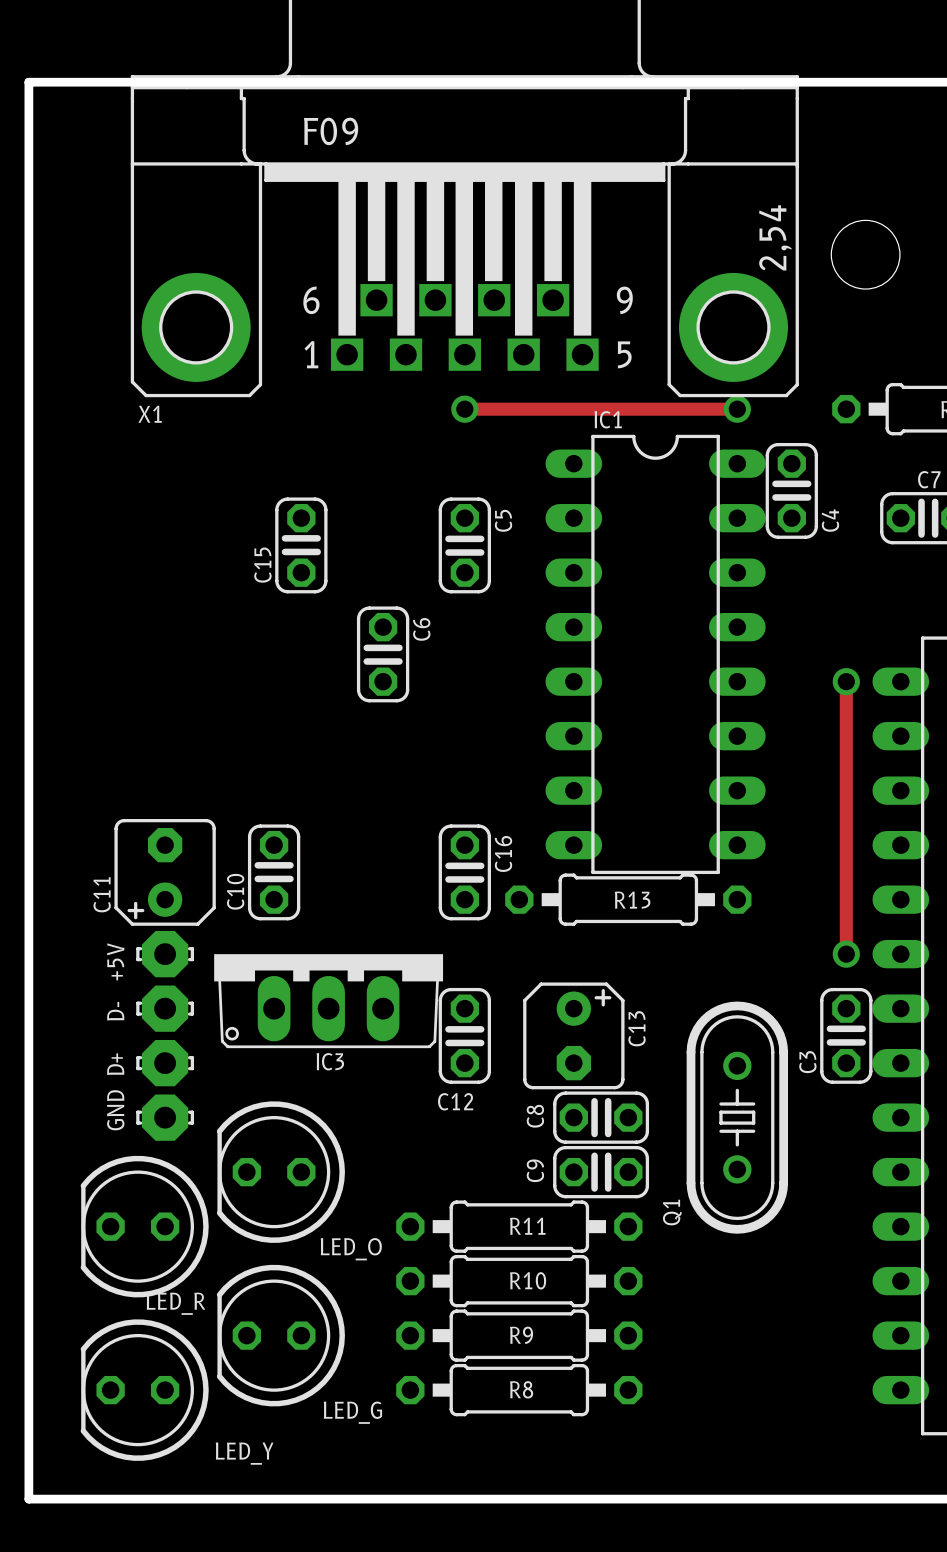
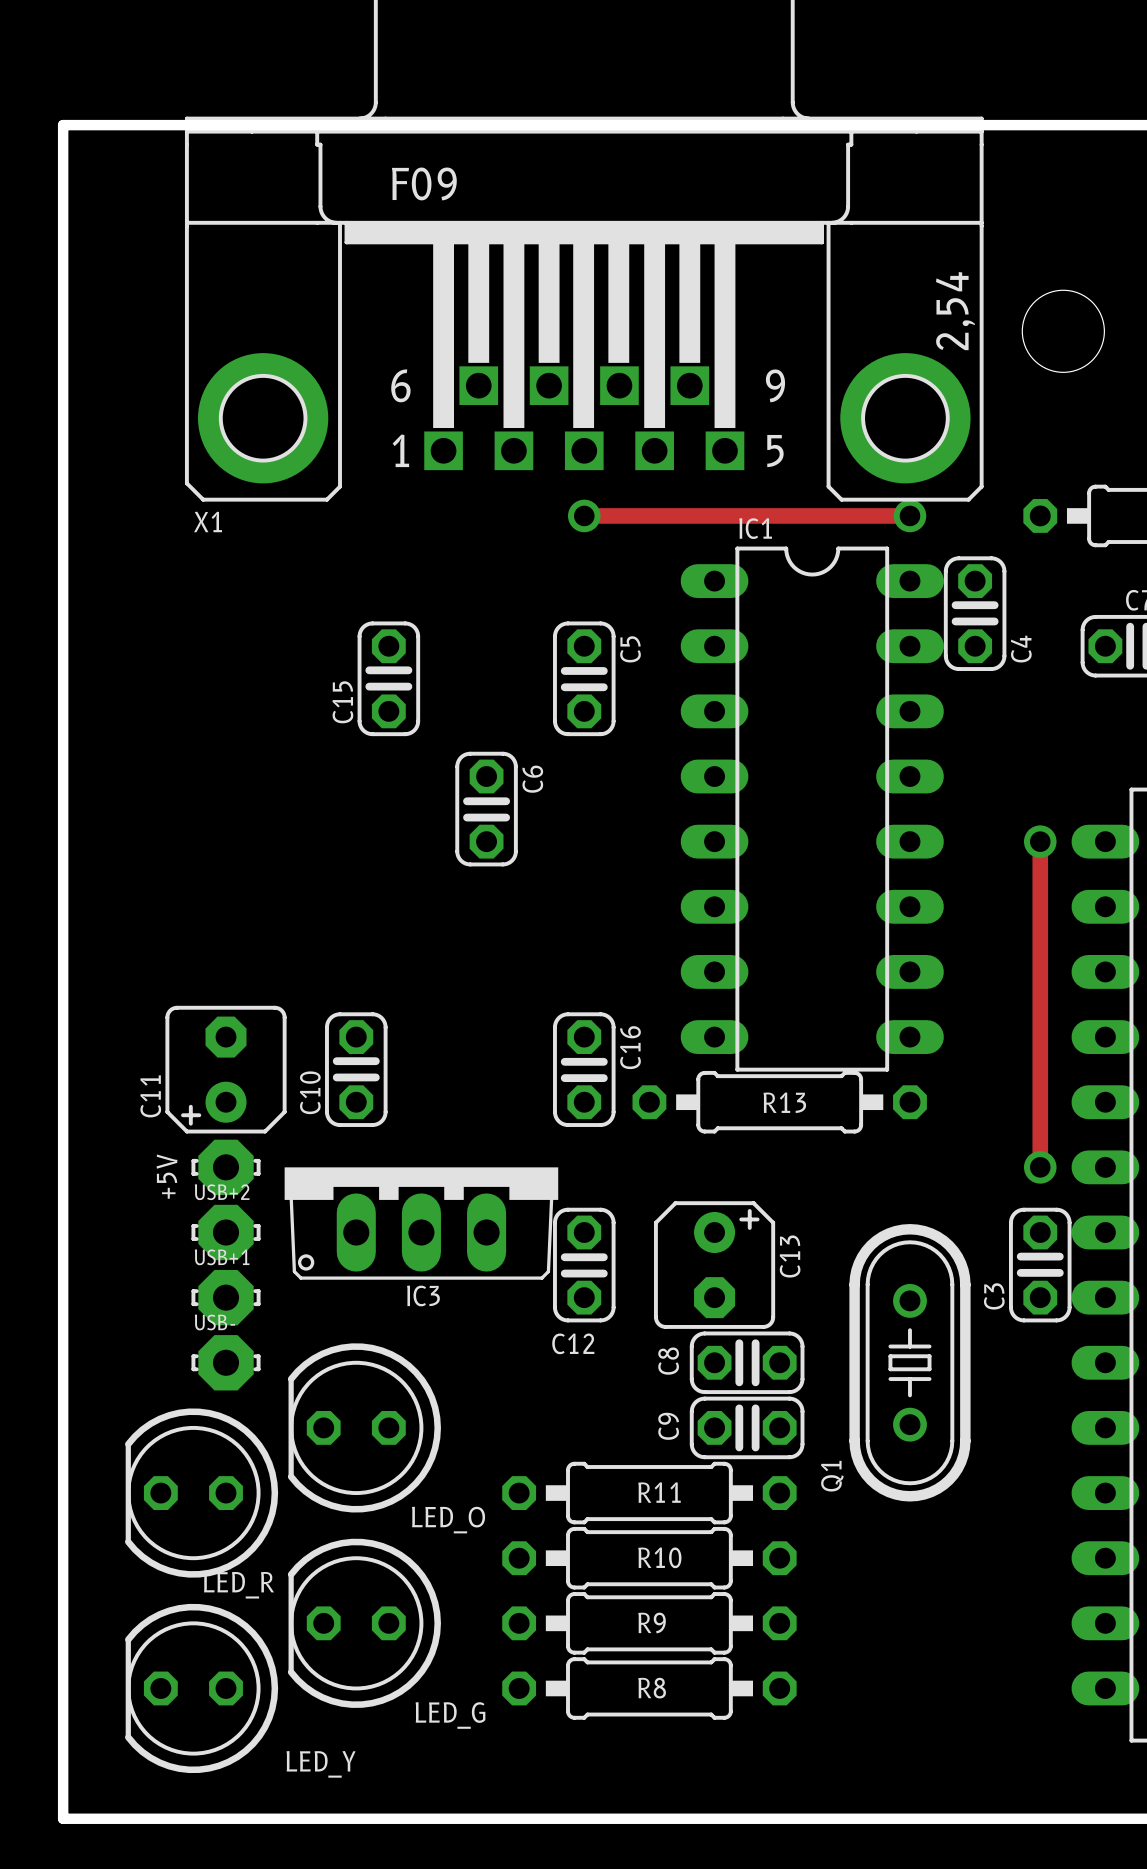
D- name: D- (115, 1011) -> USB+2 (222, 1192)
D+ name: D+ (115, 1064) -> USB+1 (222, 1257)
GND name: GND (115, 1110) -> USB- (214, 1322)

